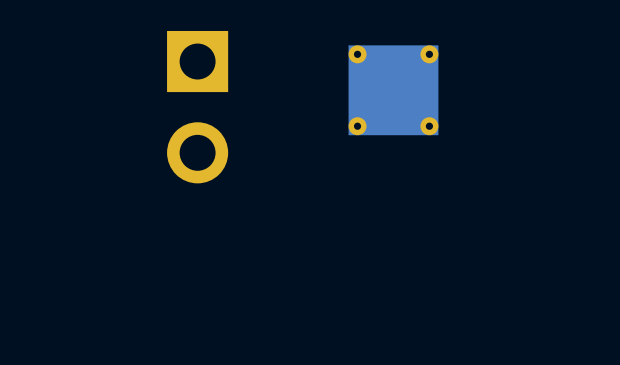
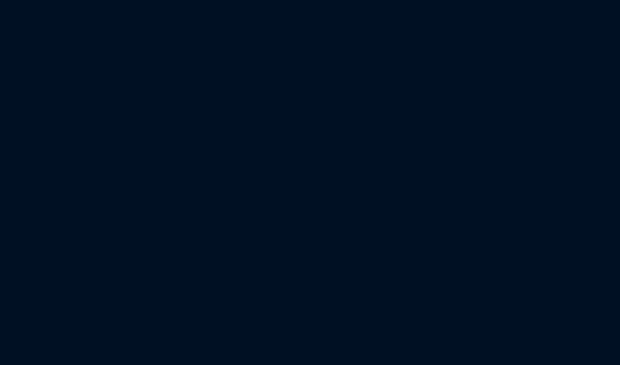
part: (393, 90) -> none
part: (197, 107) -> none

